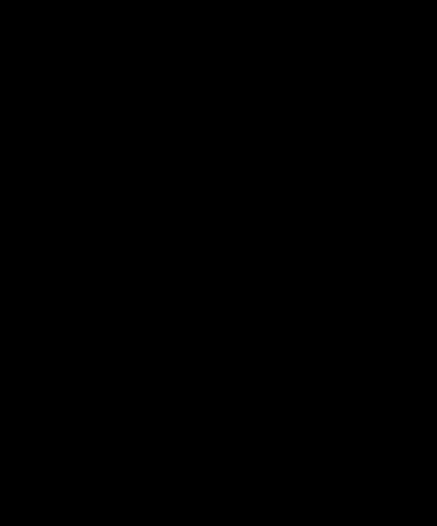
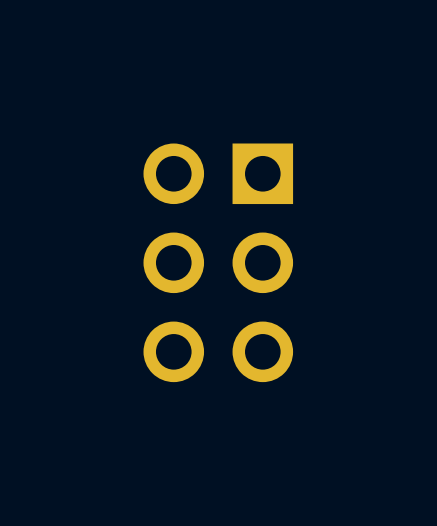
part: none -> (218, 262)

